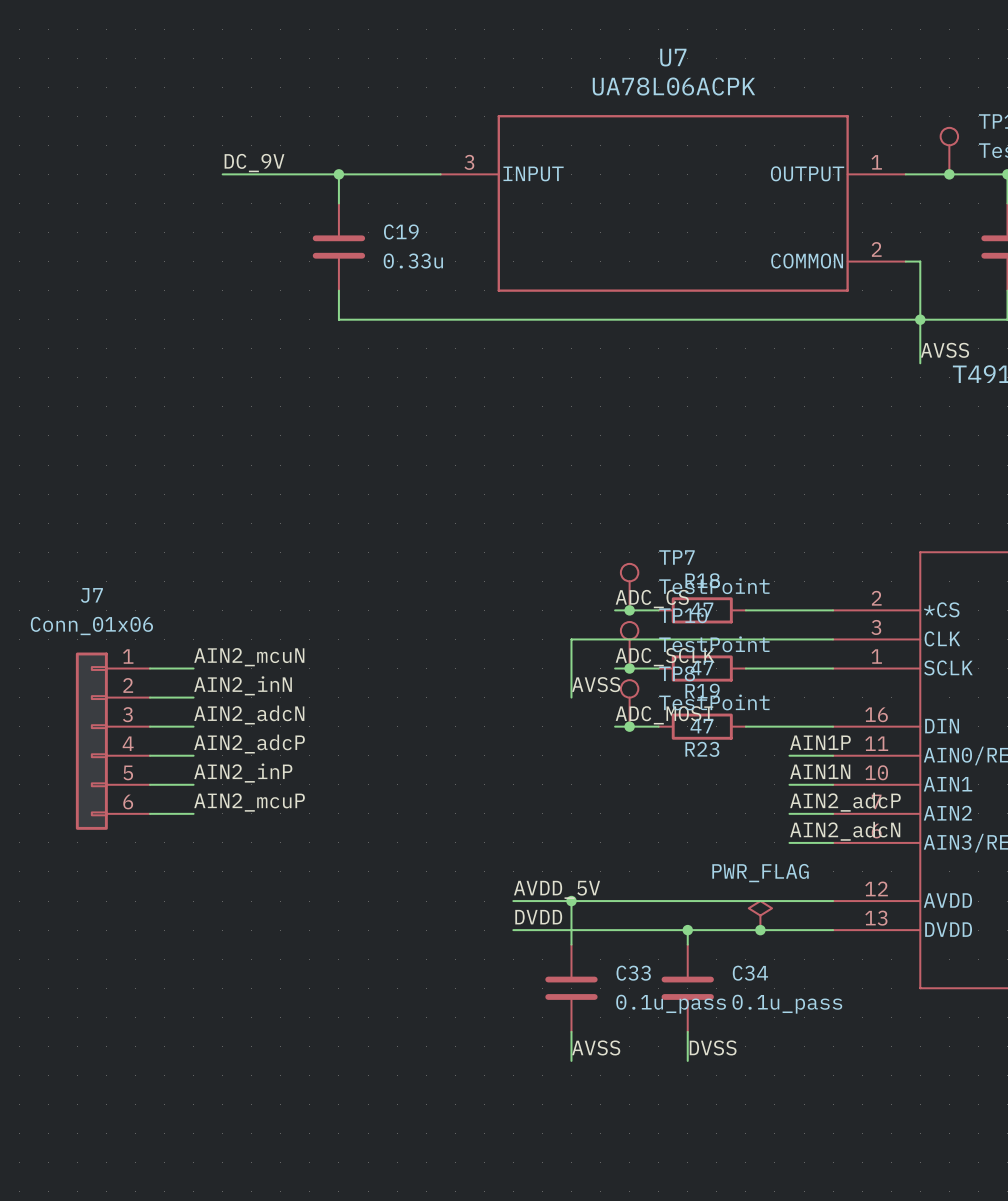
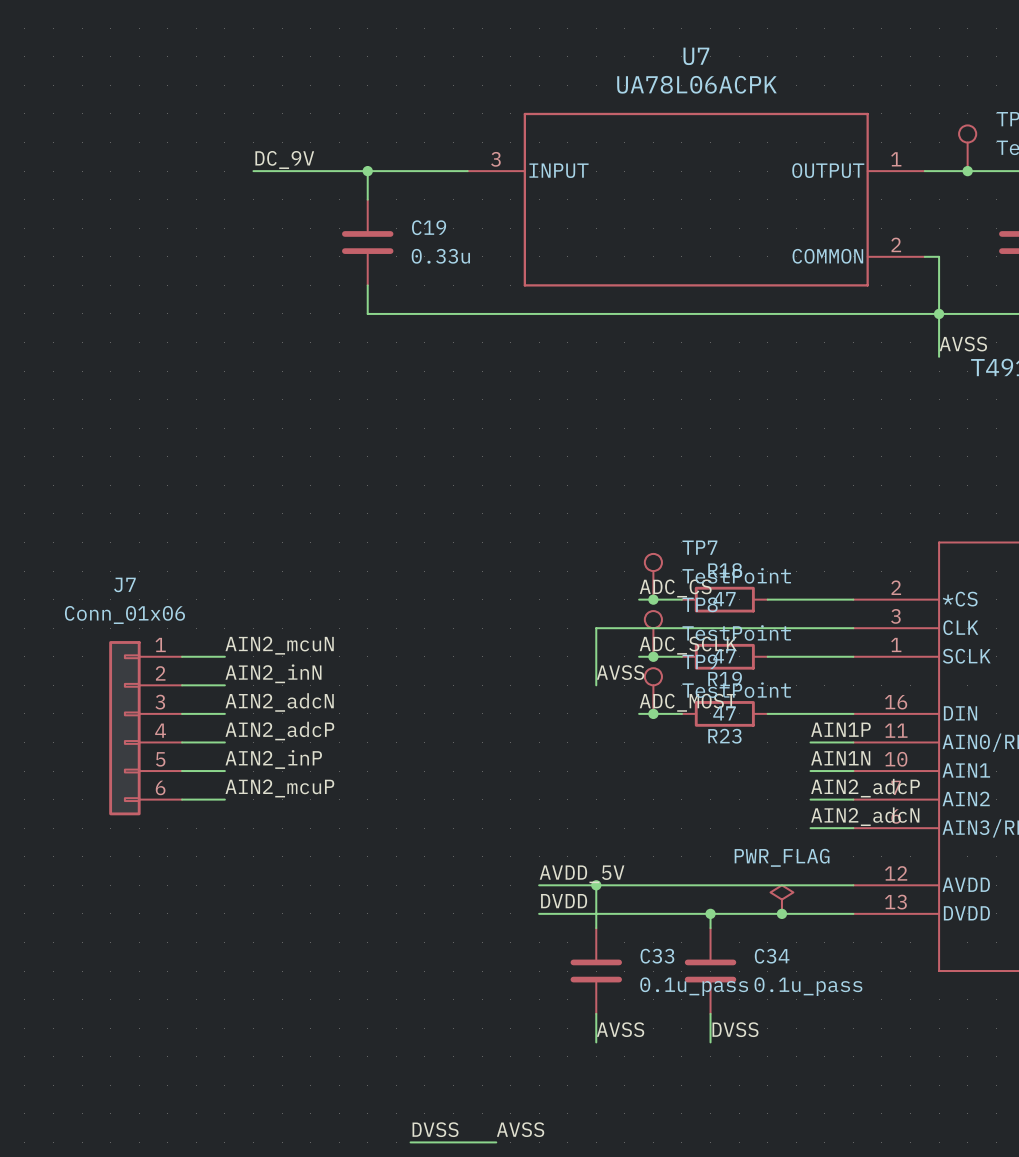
TP10 name: TP10 (683, 615) -> TP8 (700, 604)
TP8 name: TP8 (677, 673) -> TP9 (699, 661)
label: none -> DVSS (435, 1129)
label: none -> AVSS (520, 1129)
wire: none -> (410, 1142) (496, 1142)

